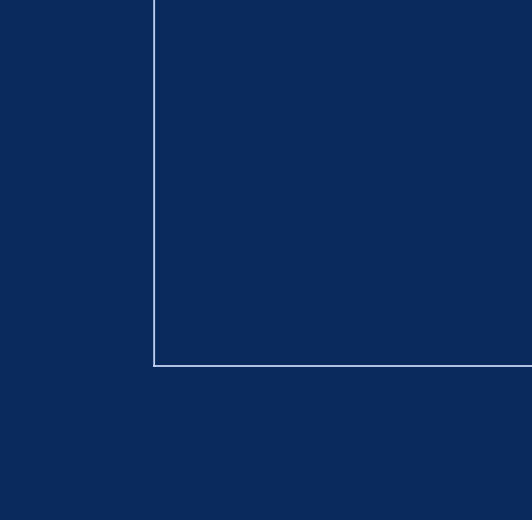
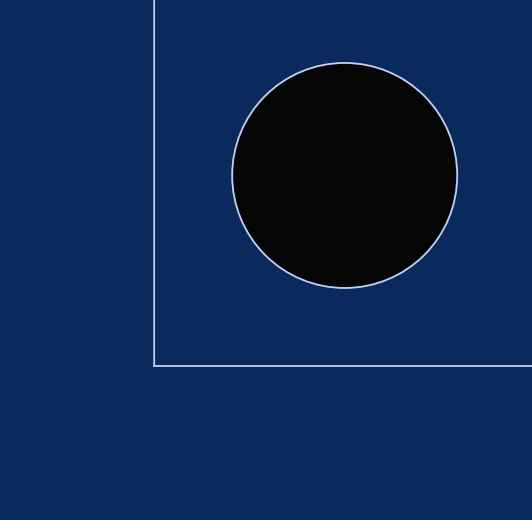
hole: none -> (344, 175)

